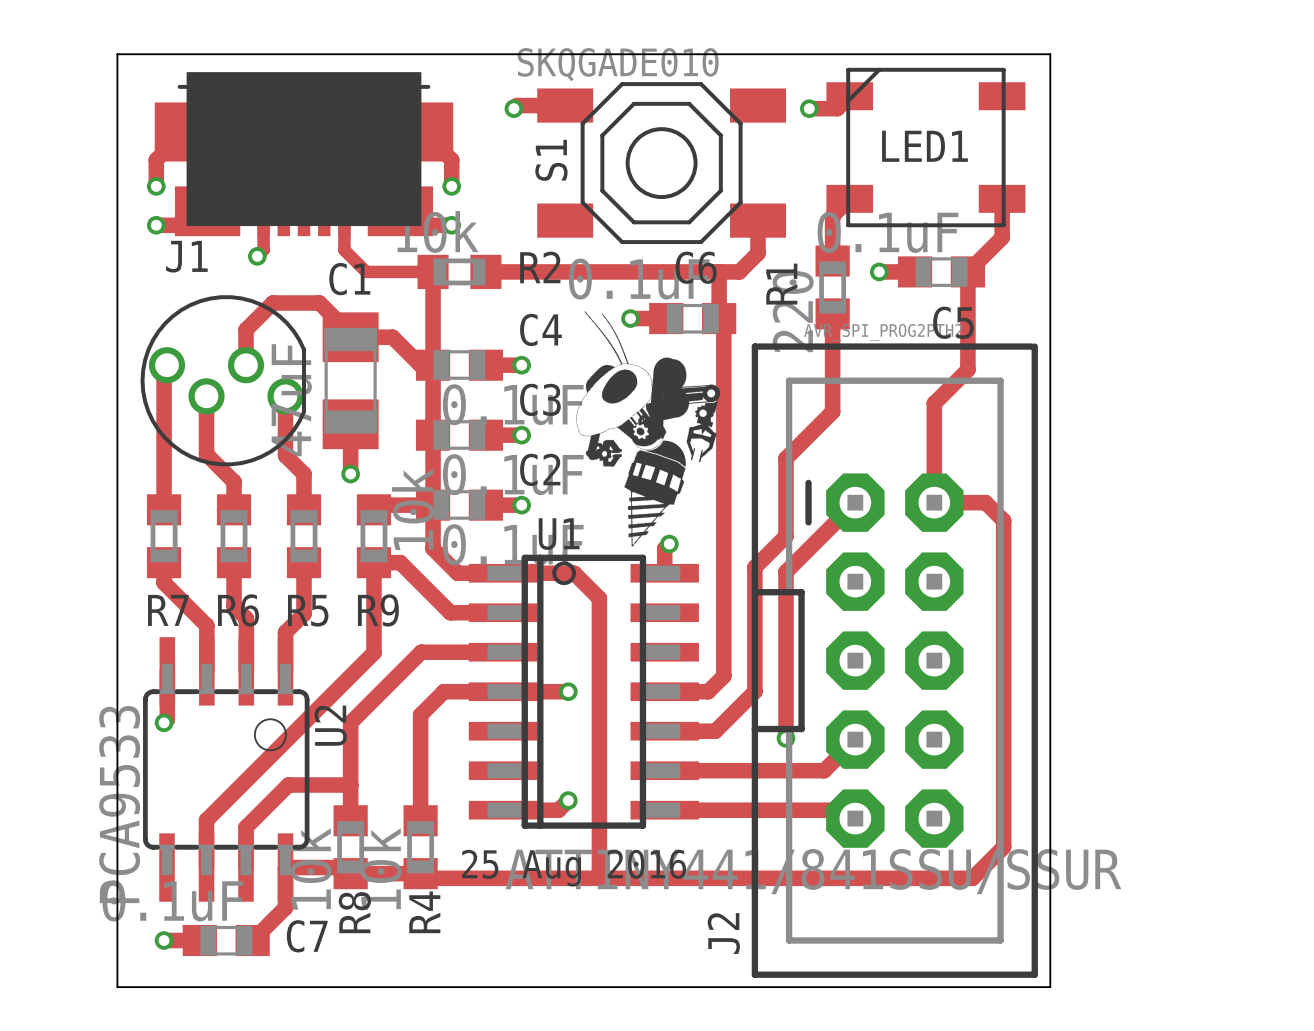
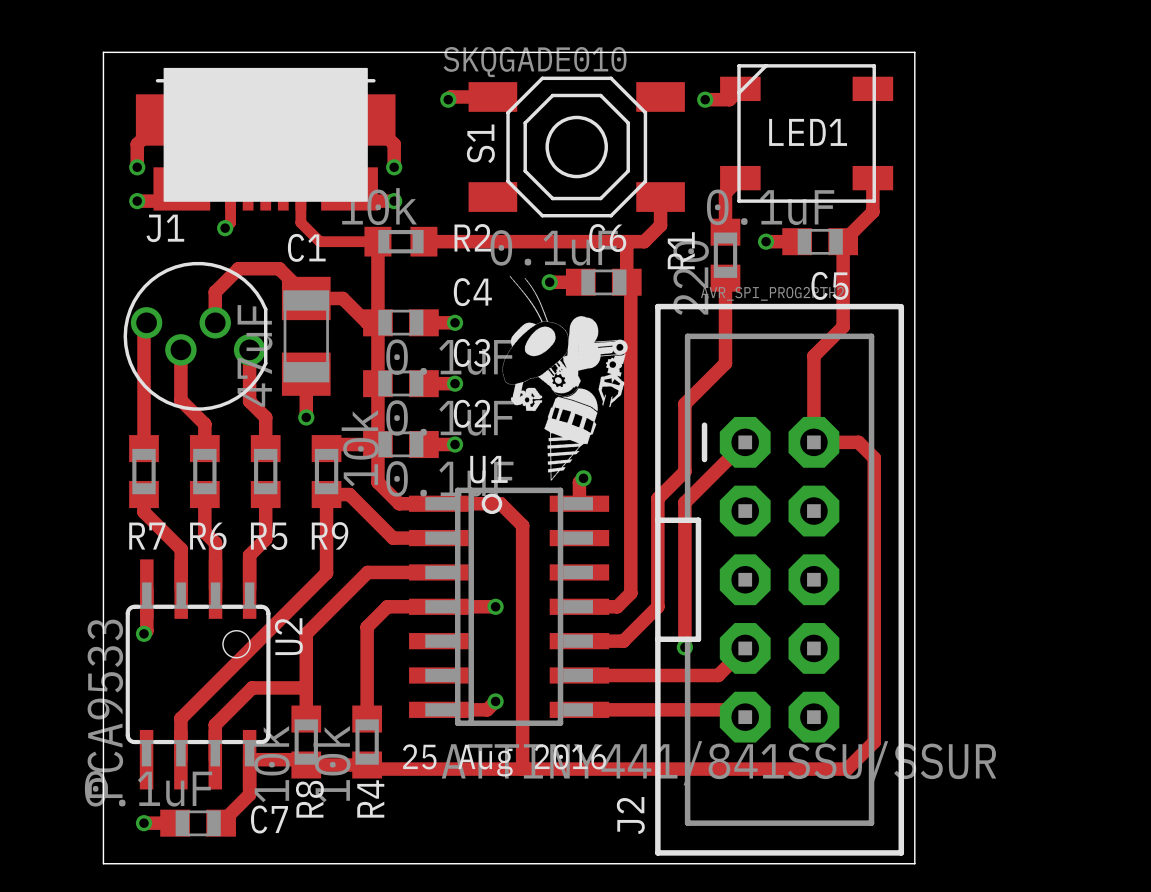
U1 footprint: [468, 554, 699, 829] -> [409, 487, 610, 726]

